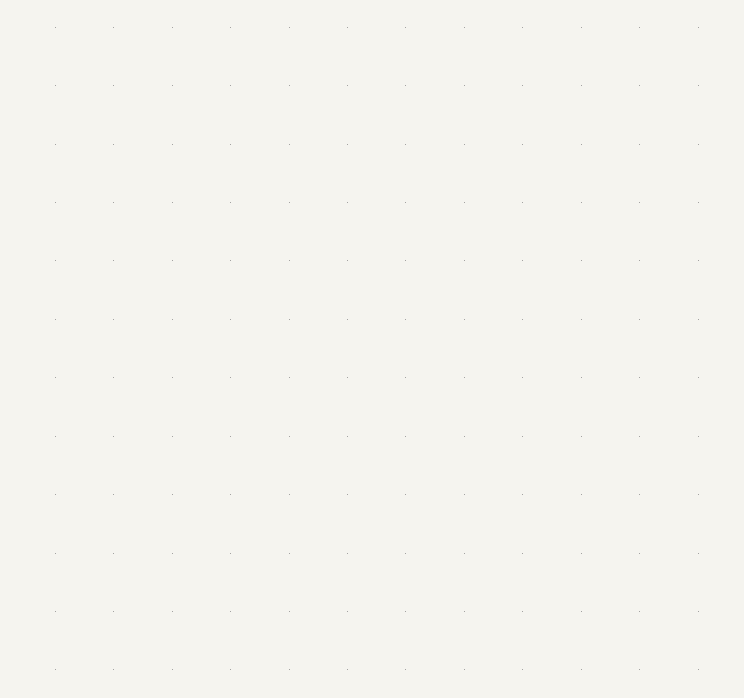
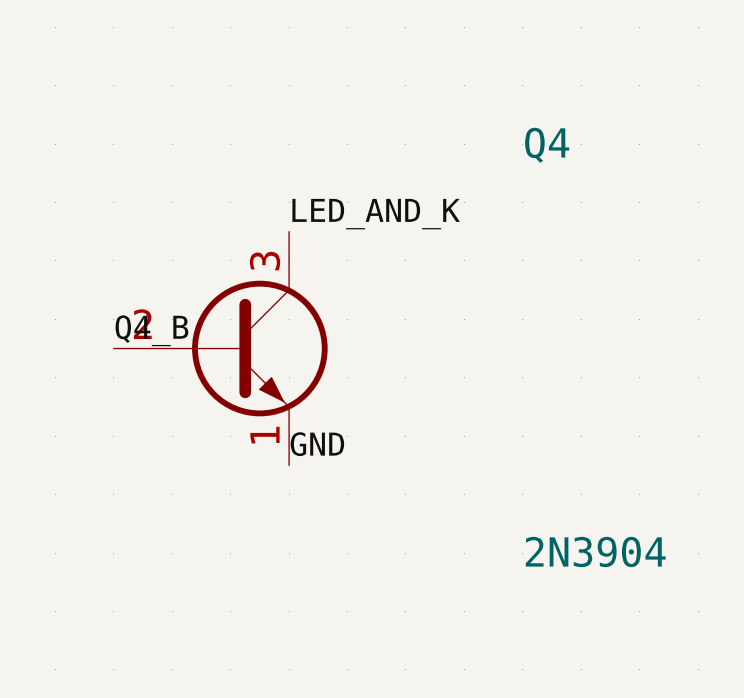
label: none -> LED_AND_K (376, 214)
label: none -> Q4_B (151, 330)
Q4: none -> 2N3904 (220, 348)
label: none -> GND (317, 444)

